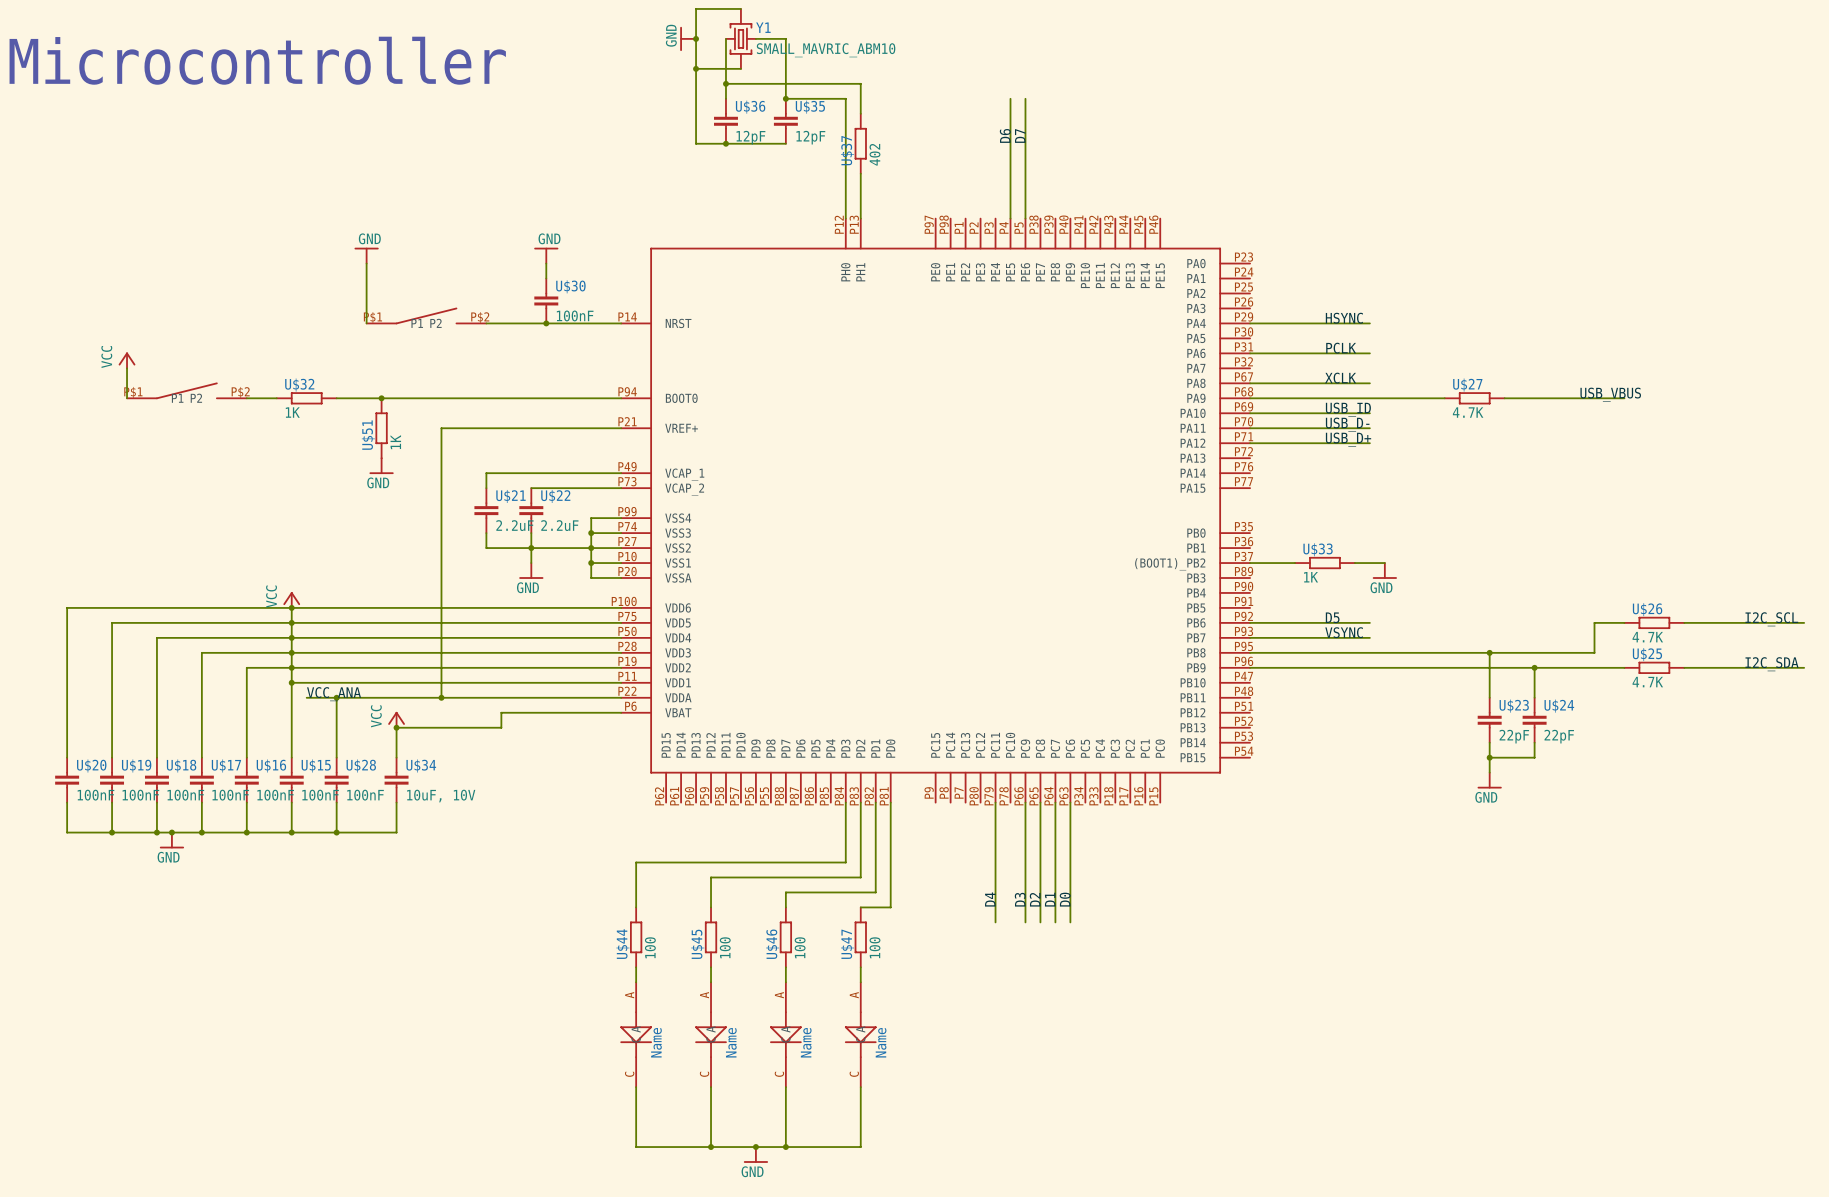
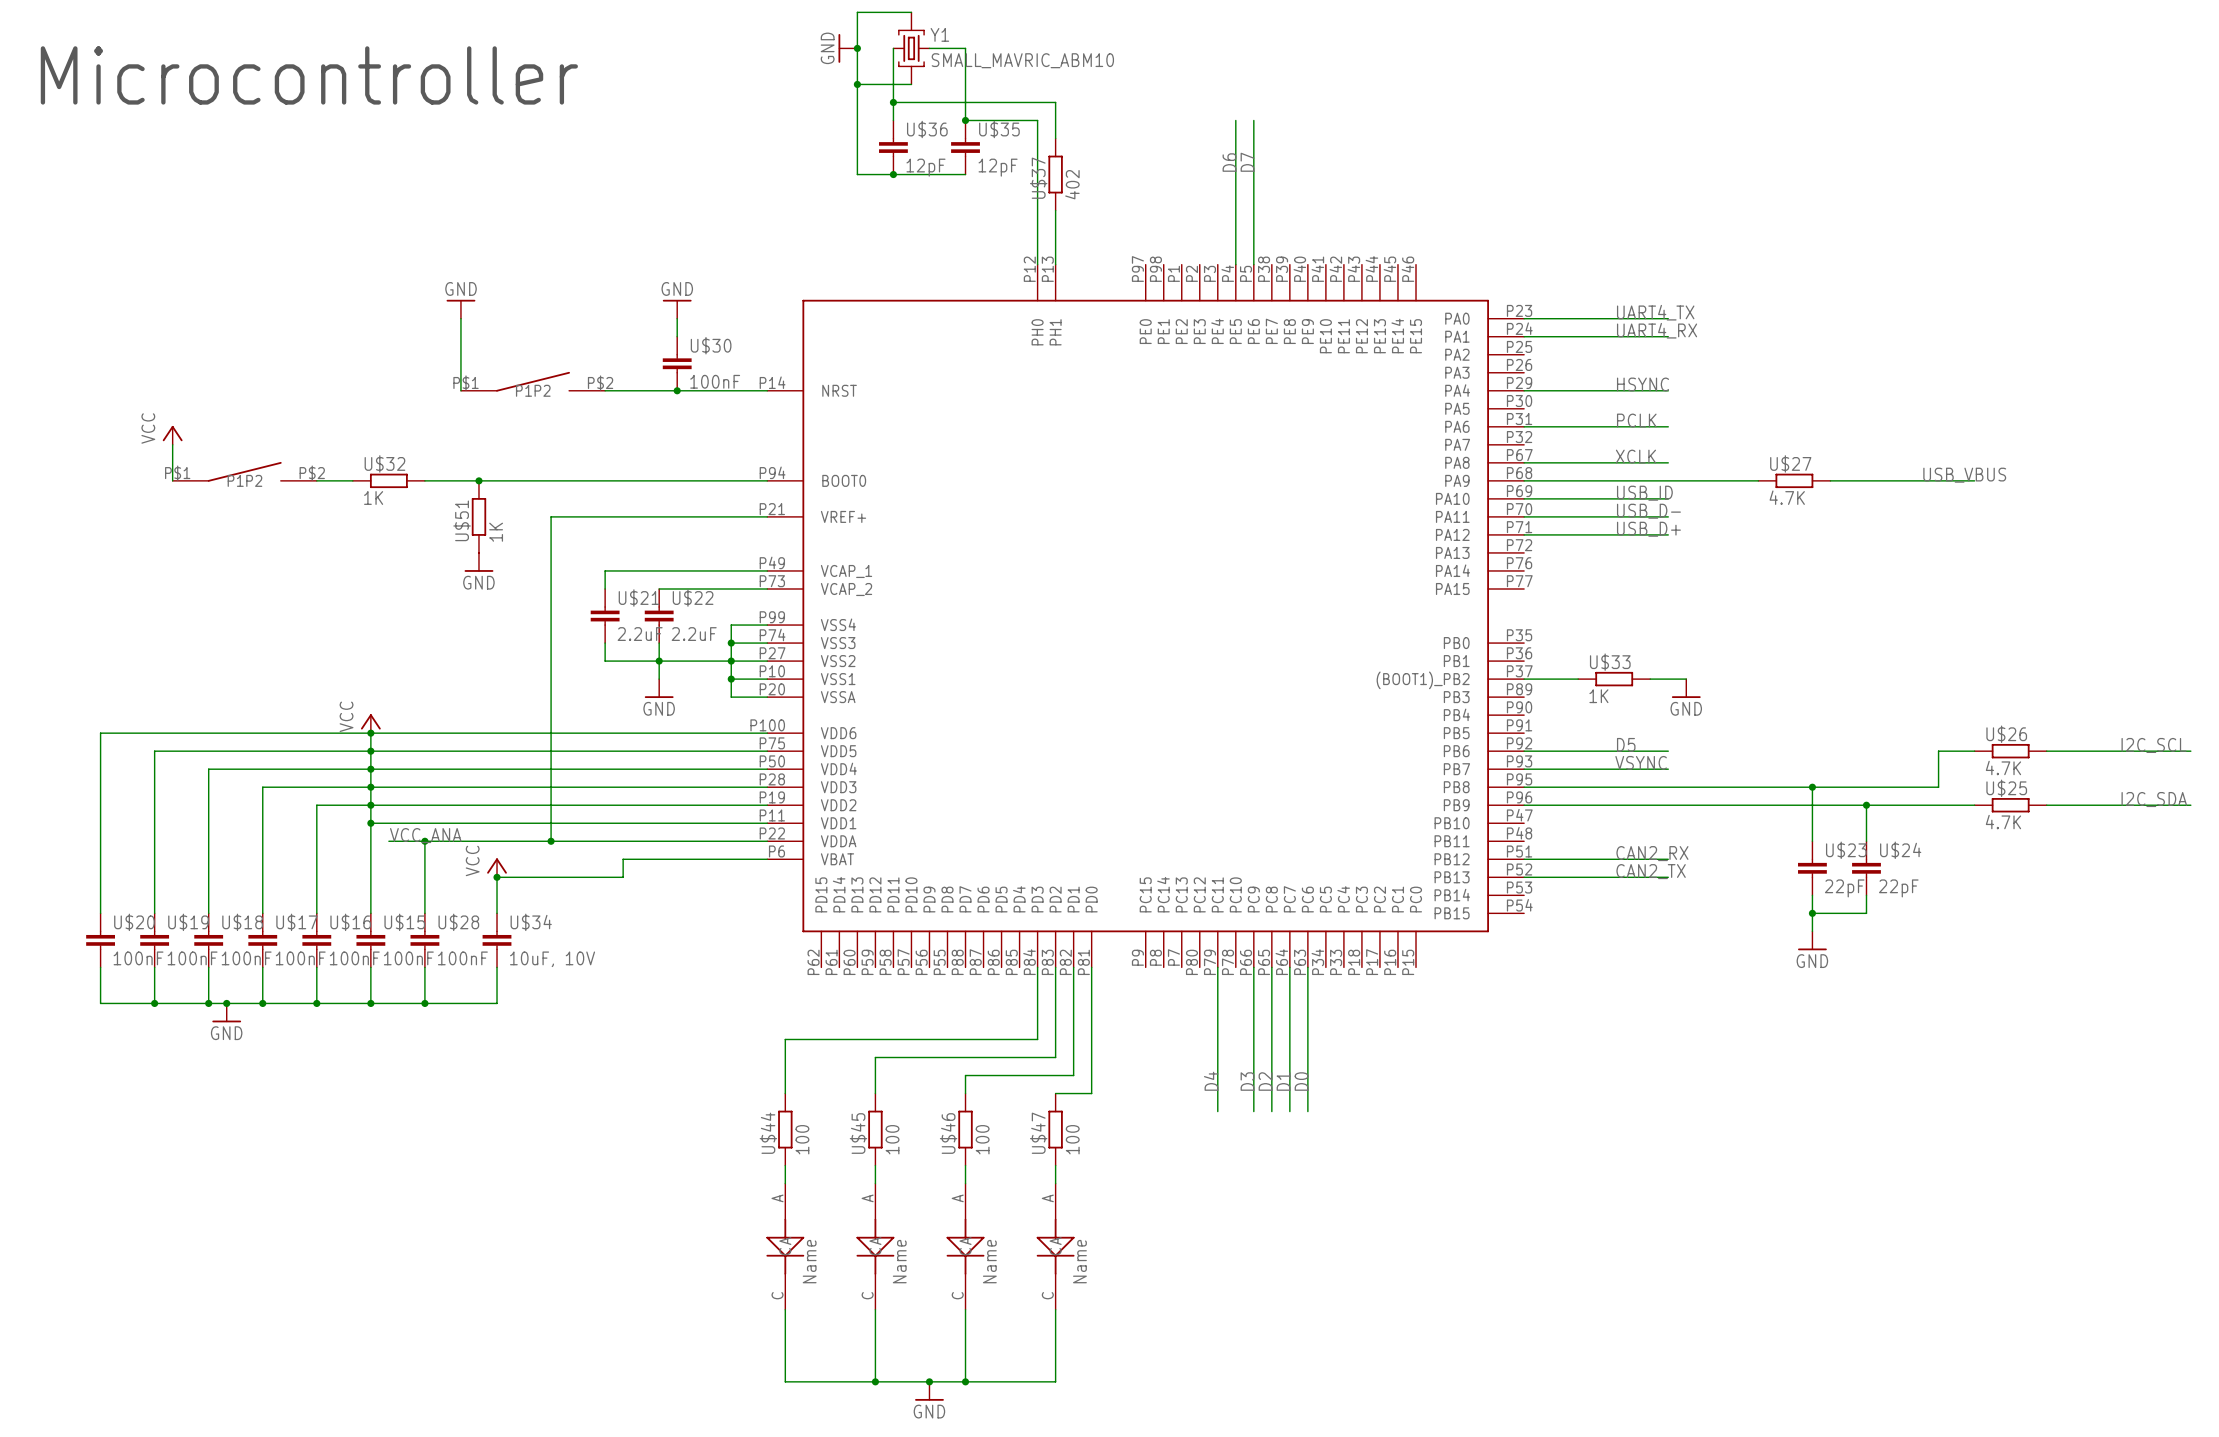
label: none -> UART4_TX (1655, 312)
wire: none -> (1524, 318) (1668, 318)
label: none -> UART4_RX (1657, 330)
wire: none -> (1524, 336) (1668, 336)
label: none -> CAN2_RX (1652, 853)
wire: none -> (1524, 859) (1668, 859)
label: none -> CAN2_TX (1651, 871)
wire: none -> (1524, 877) (1668, 877)

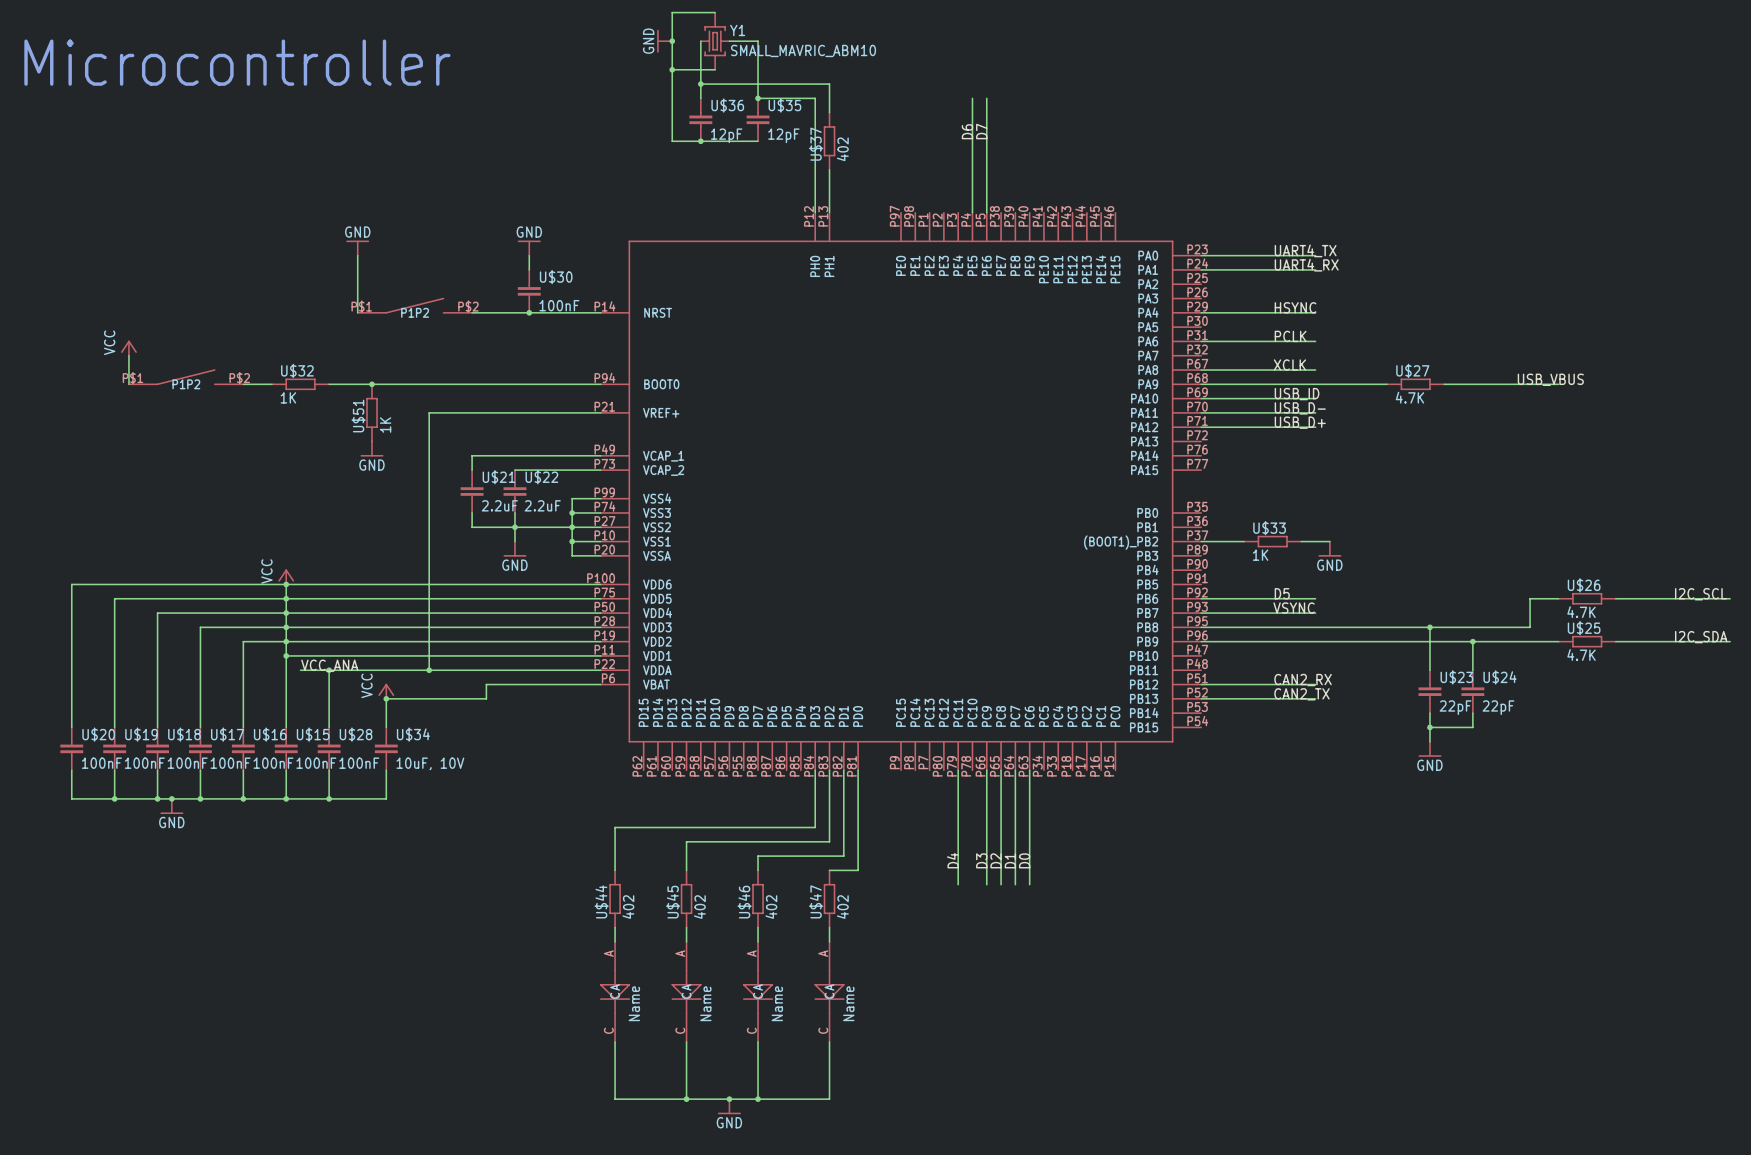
U$44 value: 100 (802, 1139) -> 402 (628, 907)
U$45 value: 100 (892, 1139) -> 402 (699, 907)
U$46 value: 100 (982, 1139) -> 402 (771, 907)
U$47 value: 100 (1072, 1139) -> 402 (842, 907)

